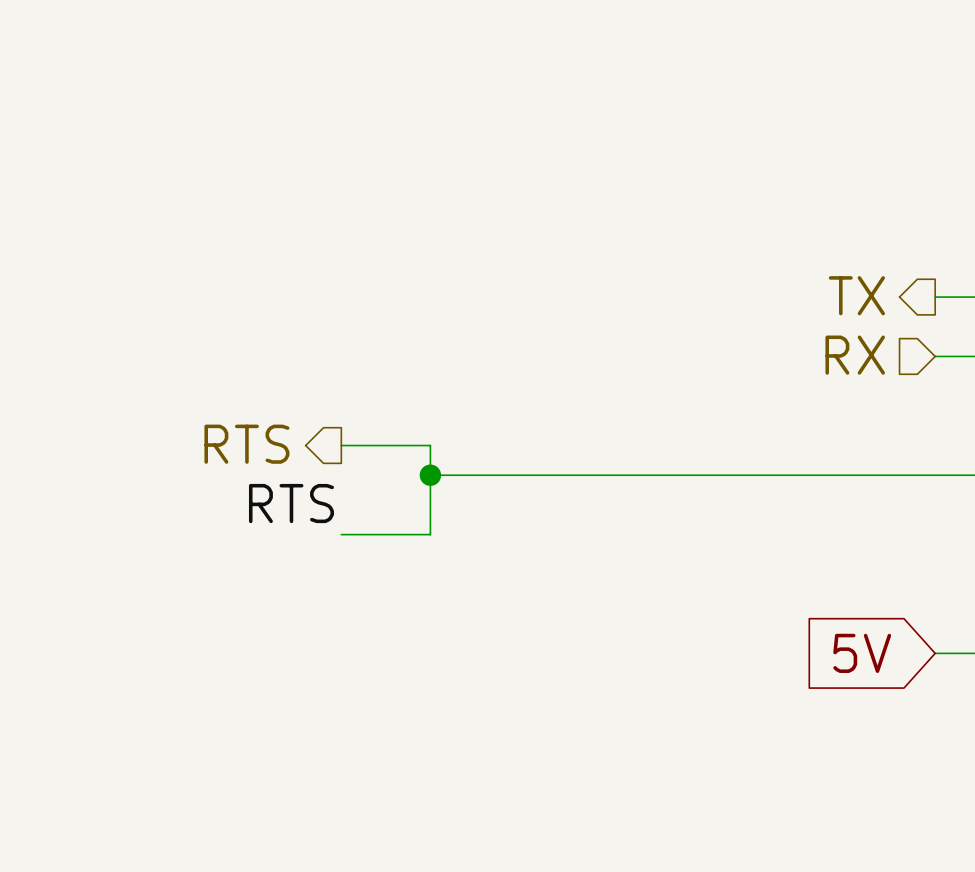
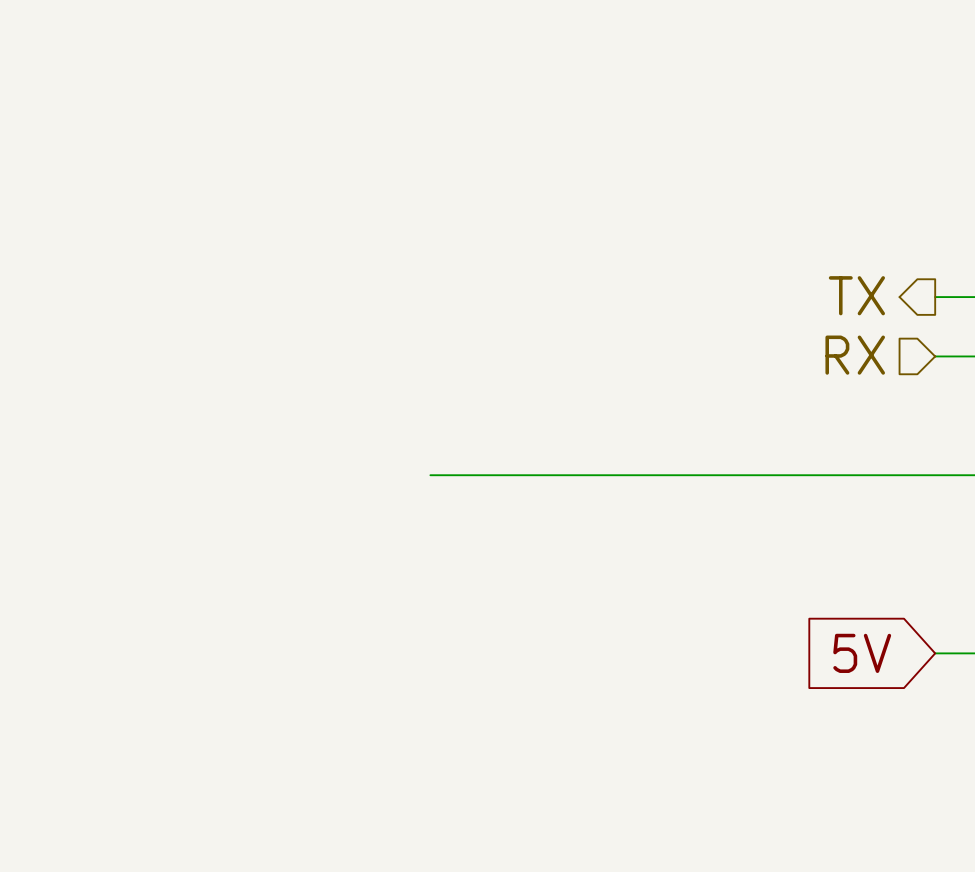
hierarchical label: RTS (246, 444) -> none
wire: (341, 445) (430, 445) (430, 534) (341, 534) -> none
junction: (430, 475) -> none
label: RTS (291, 503) -> none

